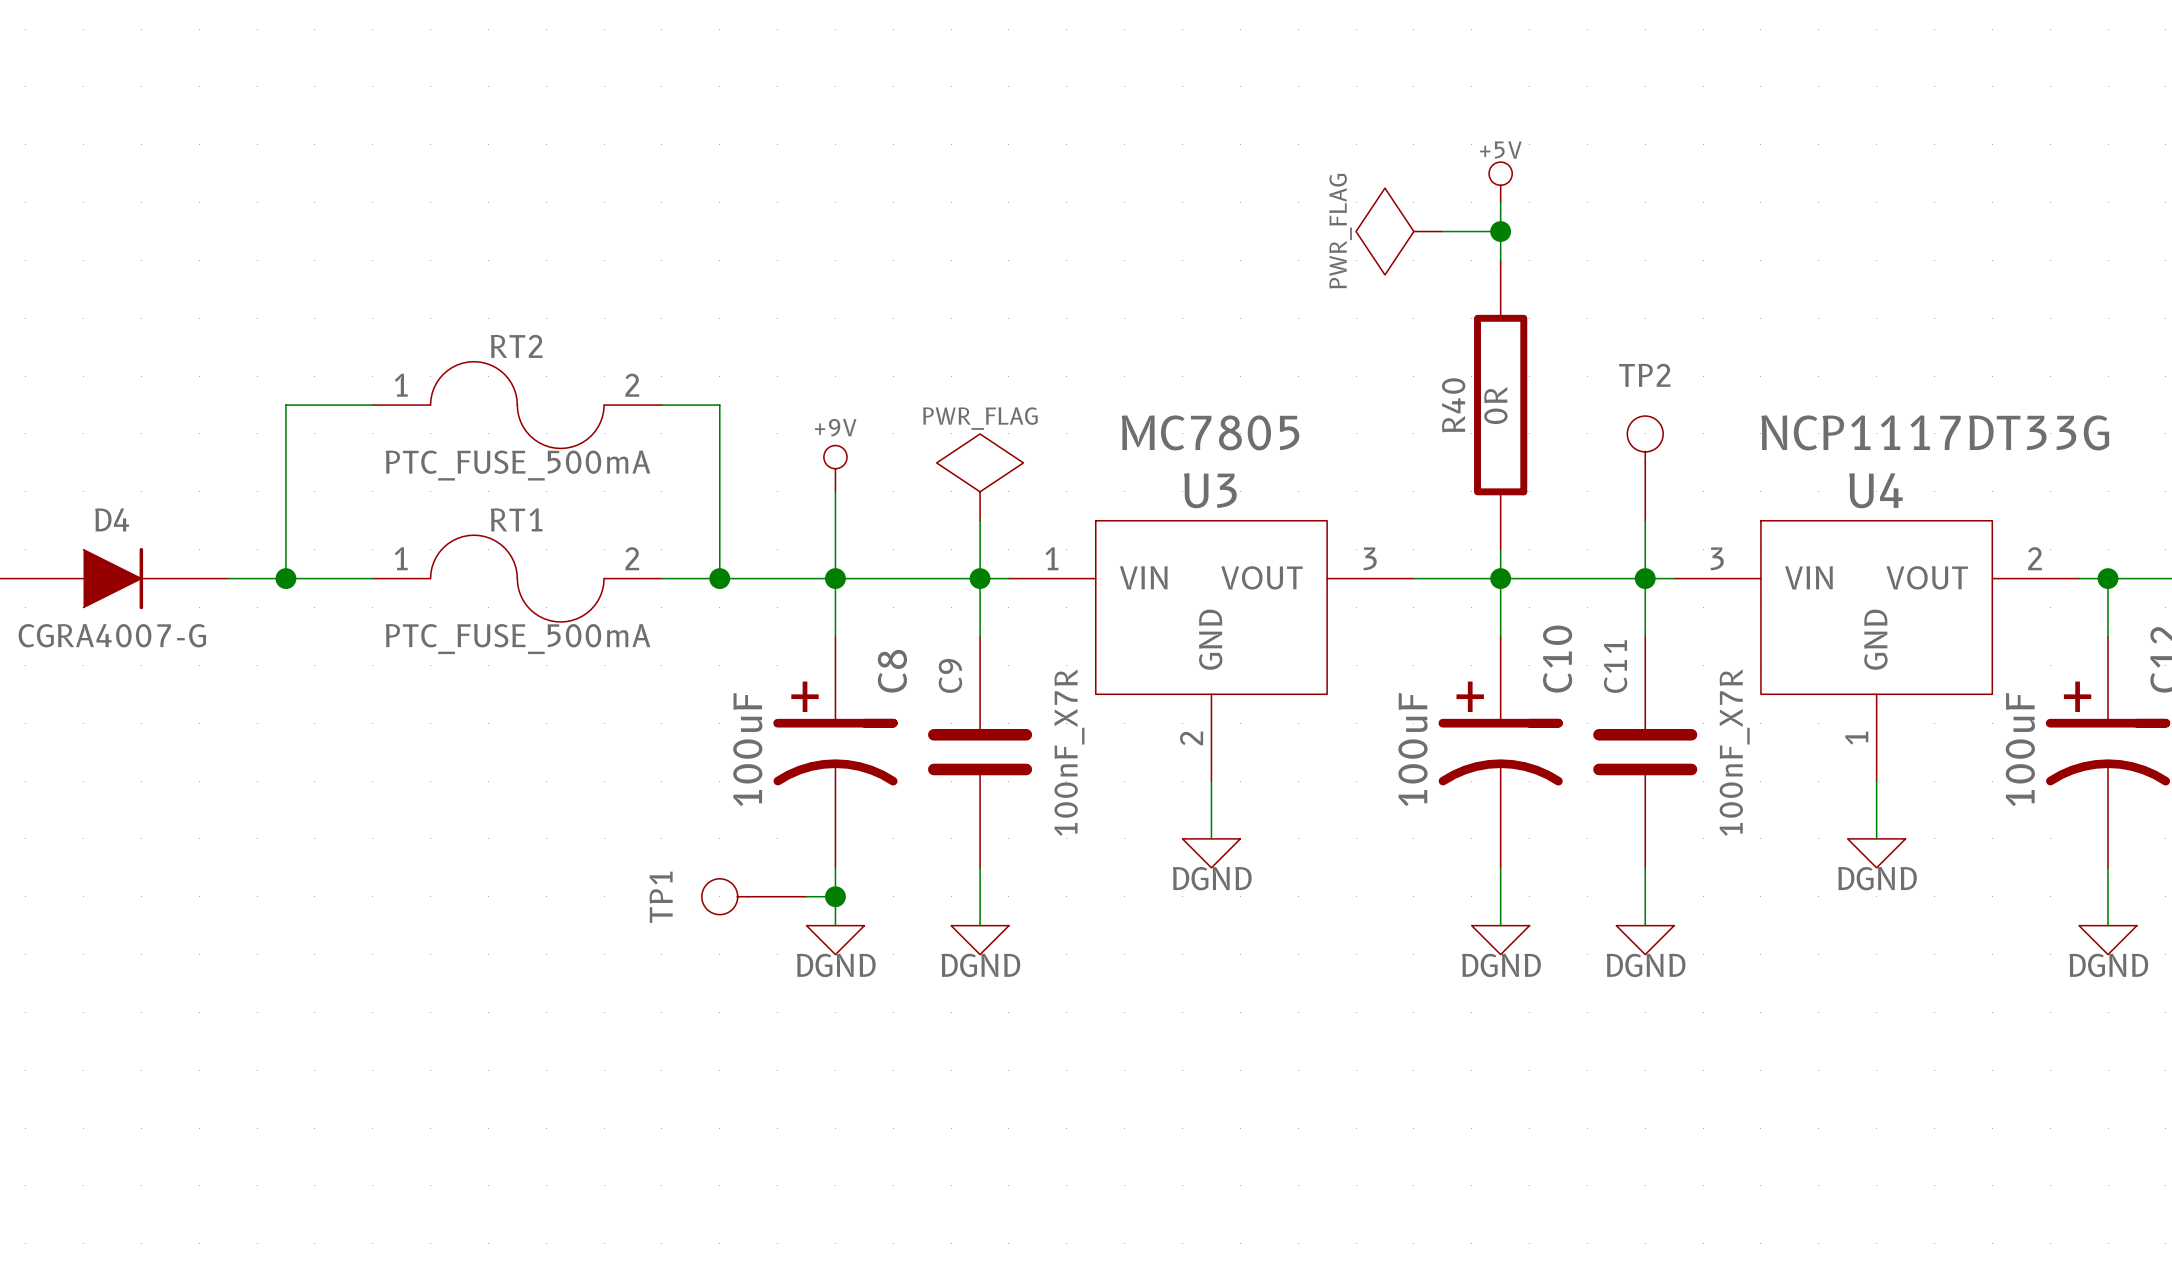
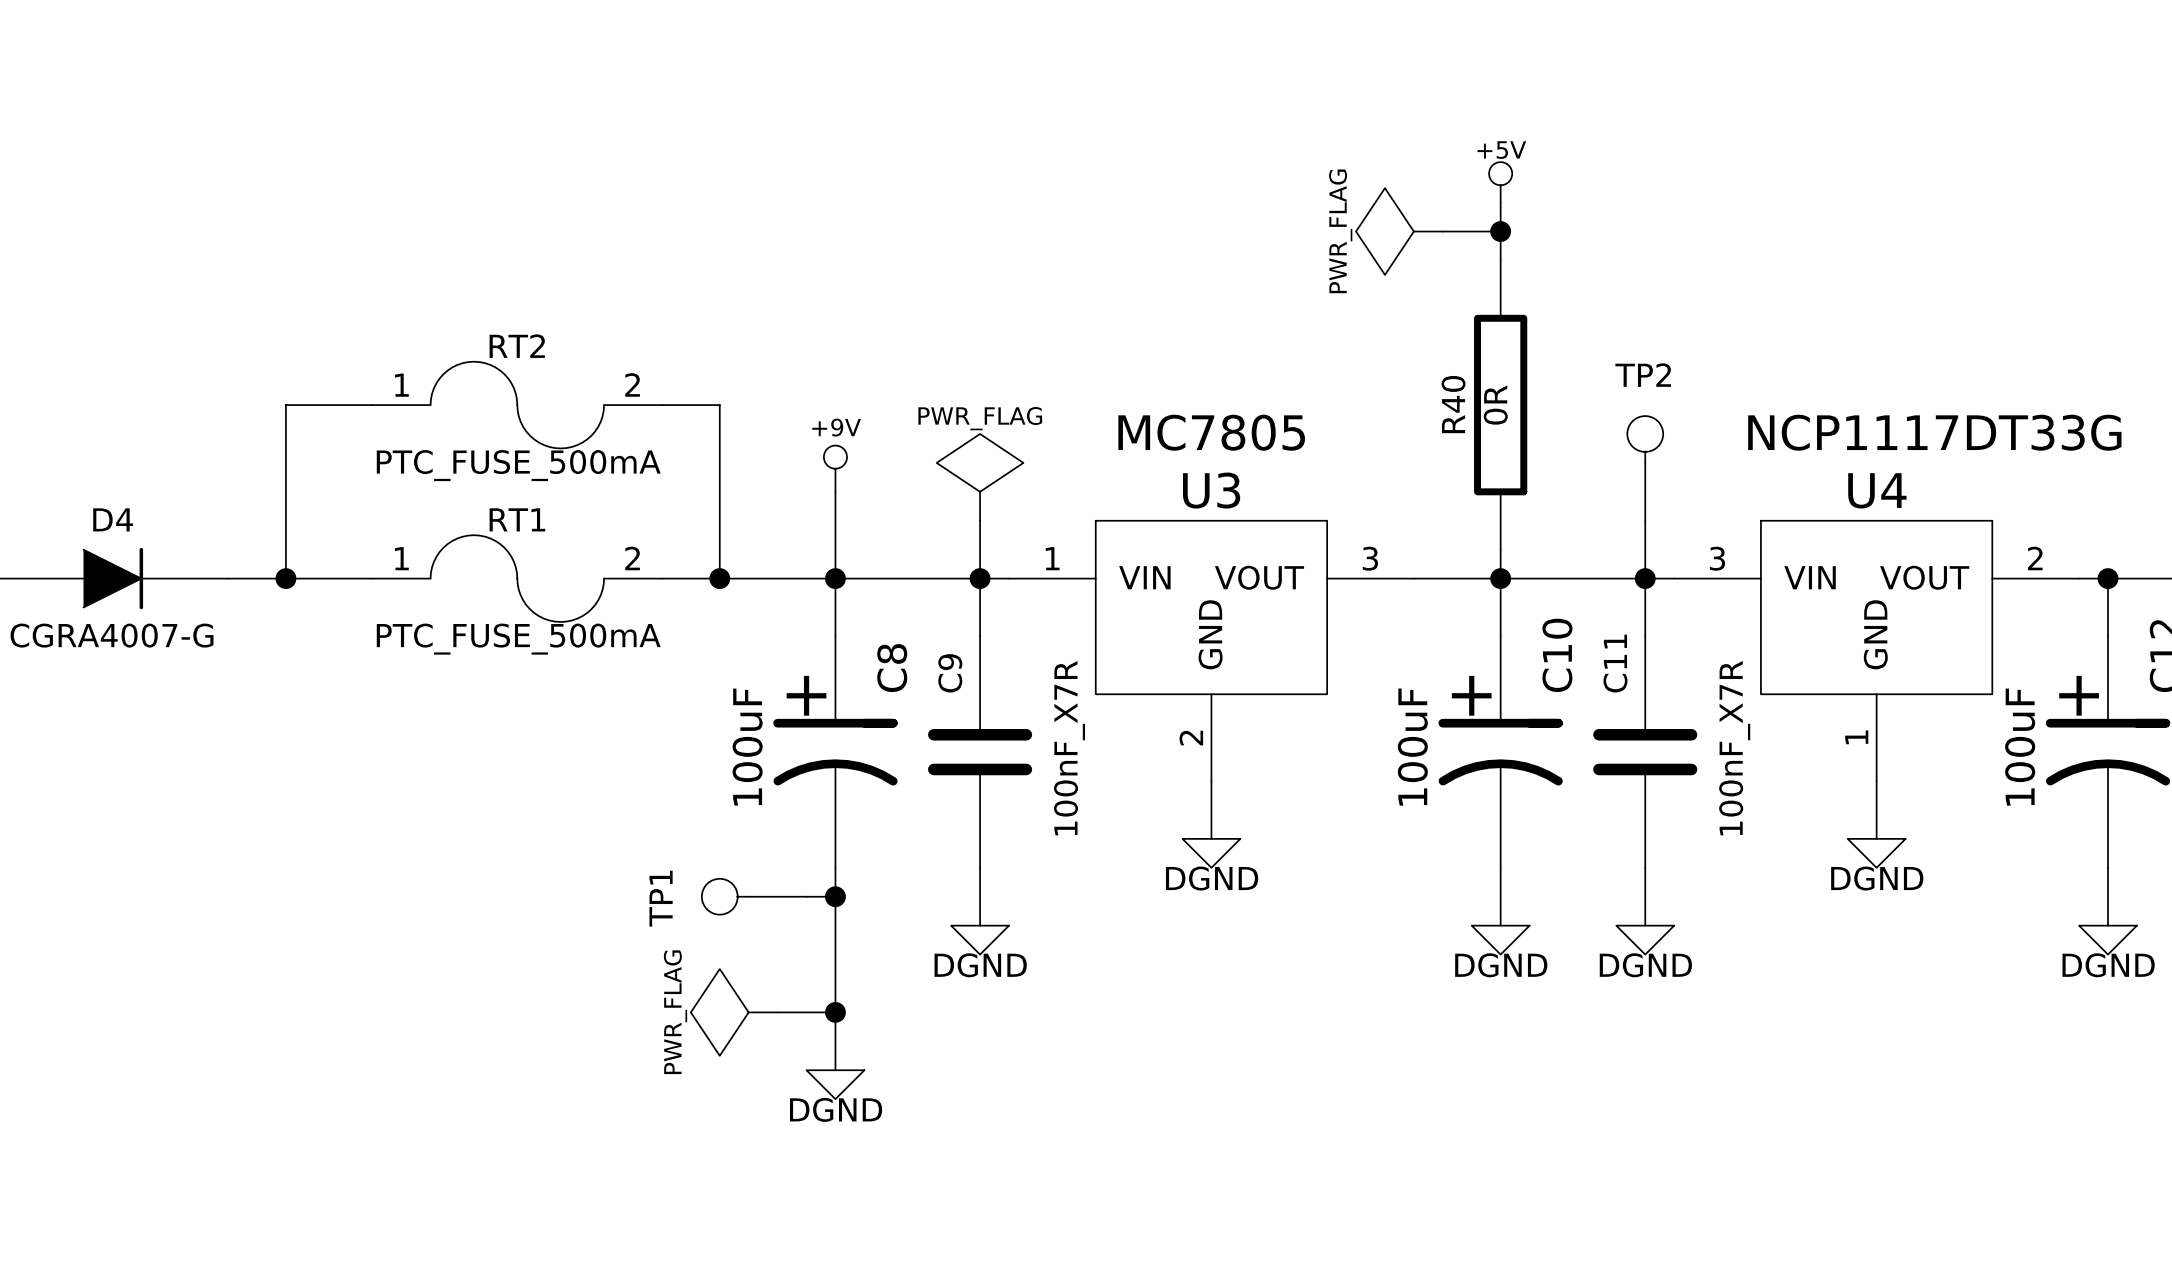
wire: none -> (835, 925) (835, 1070)
power symbol position: DGND (835, 940) -> DGND (835, 1084)
power symbol: none -> PWR_FLAG (734, 1012)
wire: none -> (777, 1012) (835, 1012)
junction: none -> (835, 1012)

